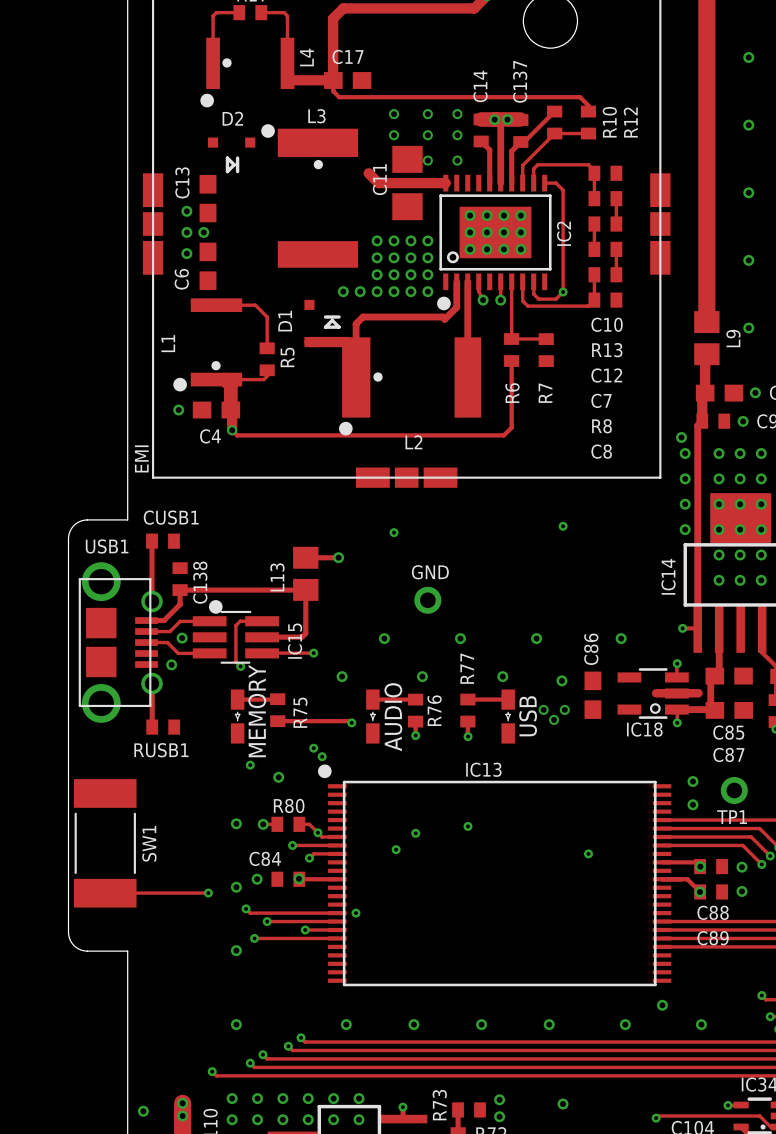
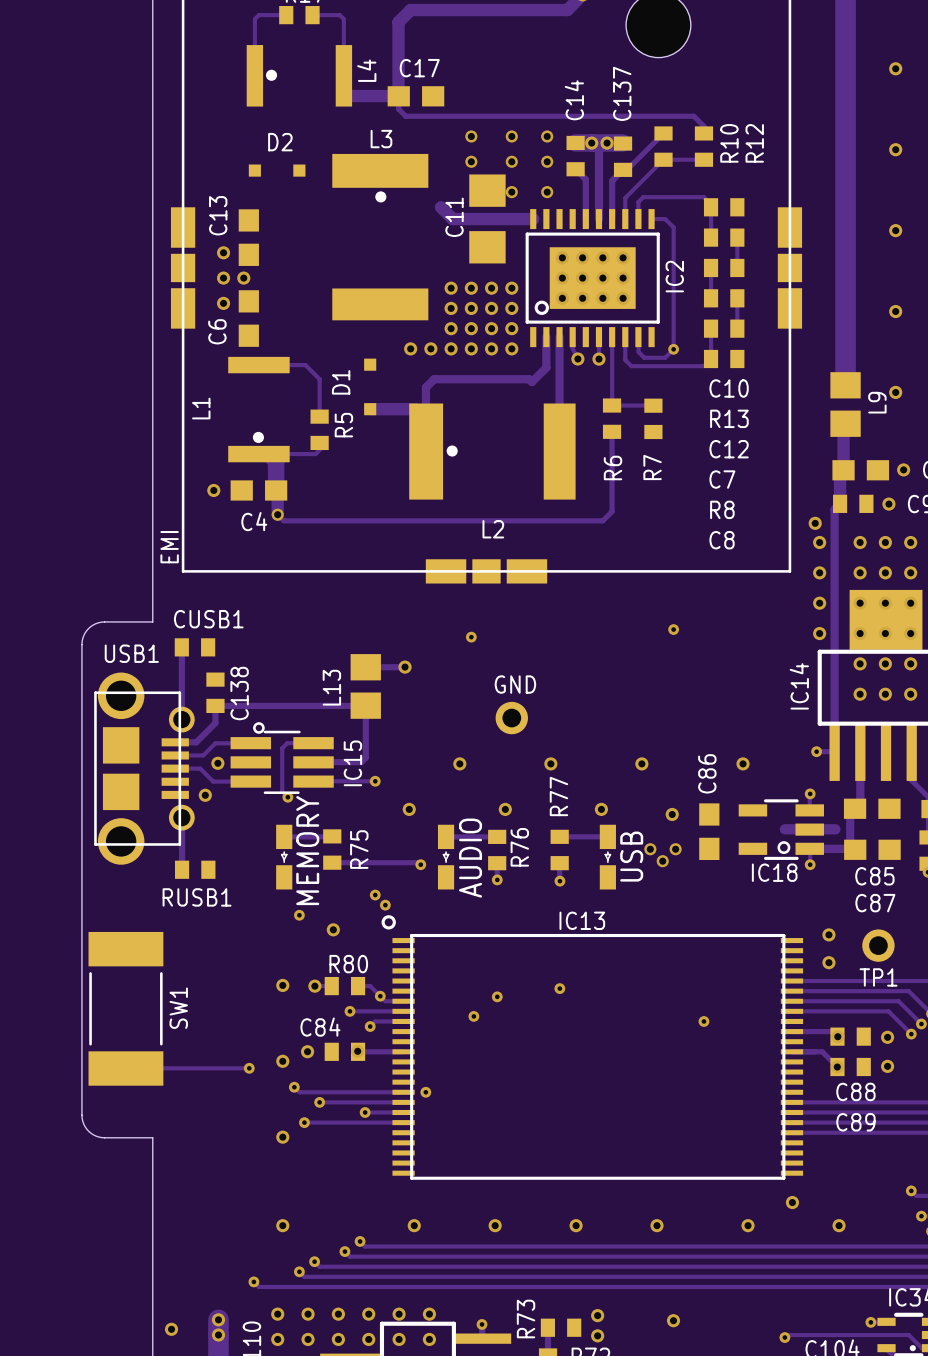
drawing: [200, 93, 214, 108] -> none
drawing: [261, 124, 275, 138] -> none
line: (227, 158) (227, 171) (234, 164) (227, 158) -> none
line: (237, 158) (237, 171) -> none
drawing: [437, 296, 451, 311] -> none
line: (325, 317) (339, 317) -> none
line: (332, 320) (339, 327) (325, 327) (332, 320) -> none
drawing: [173, 377, 187, 392] -> none
drawing: [339, 421, 353, 436] -> none
drawing: [208, 600, 223, 614] -> none
drawing: [318, 764, 332, 779] -> none

